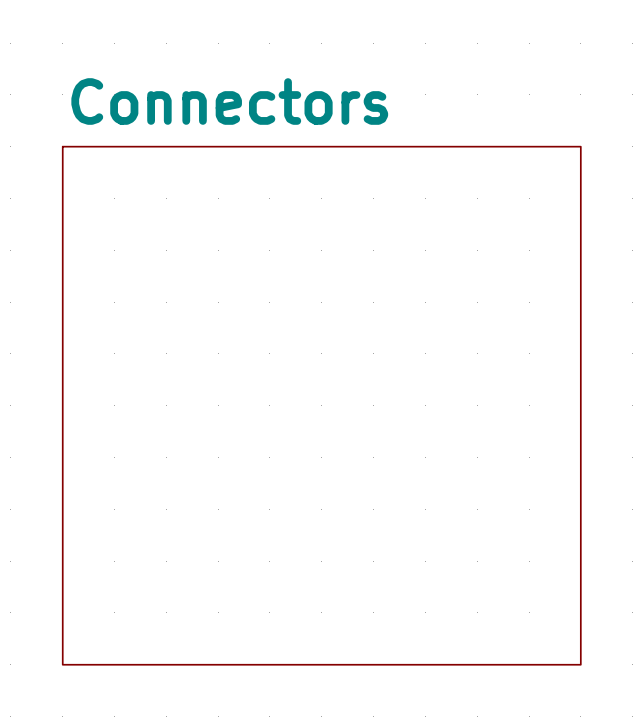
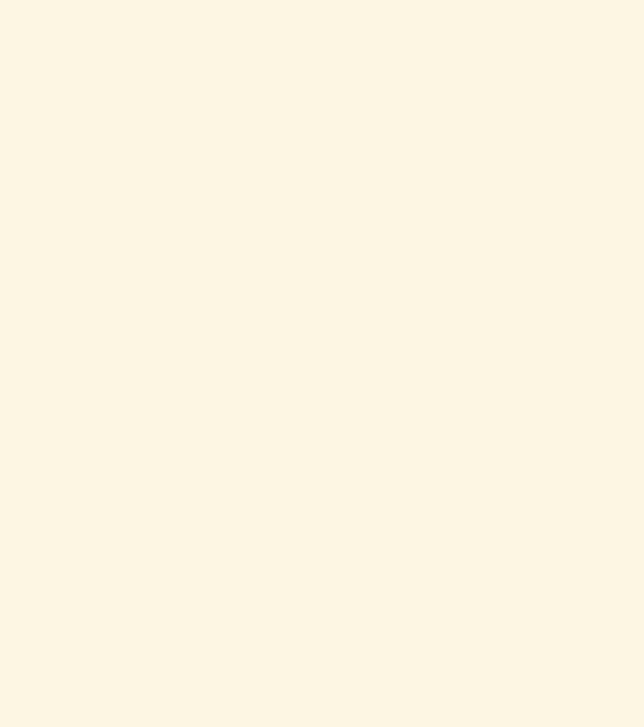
sheet Connectors: (321, 405) -> none

